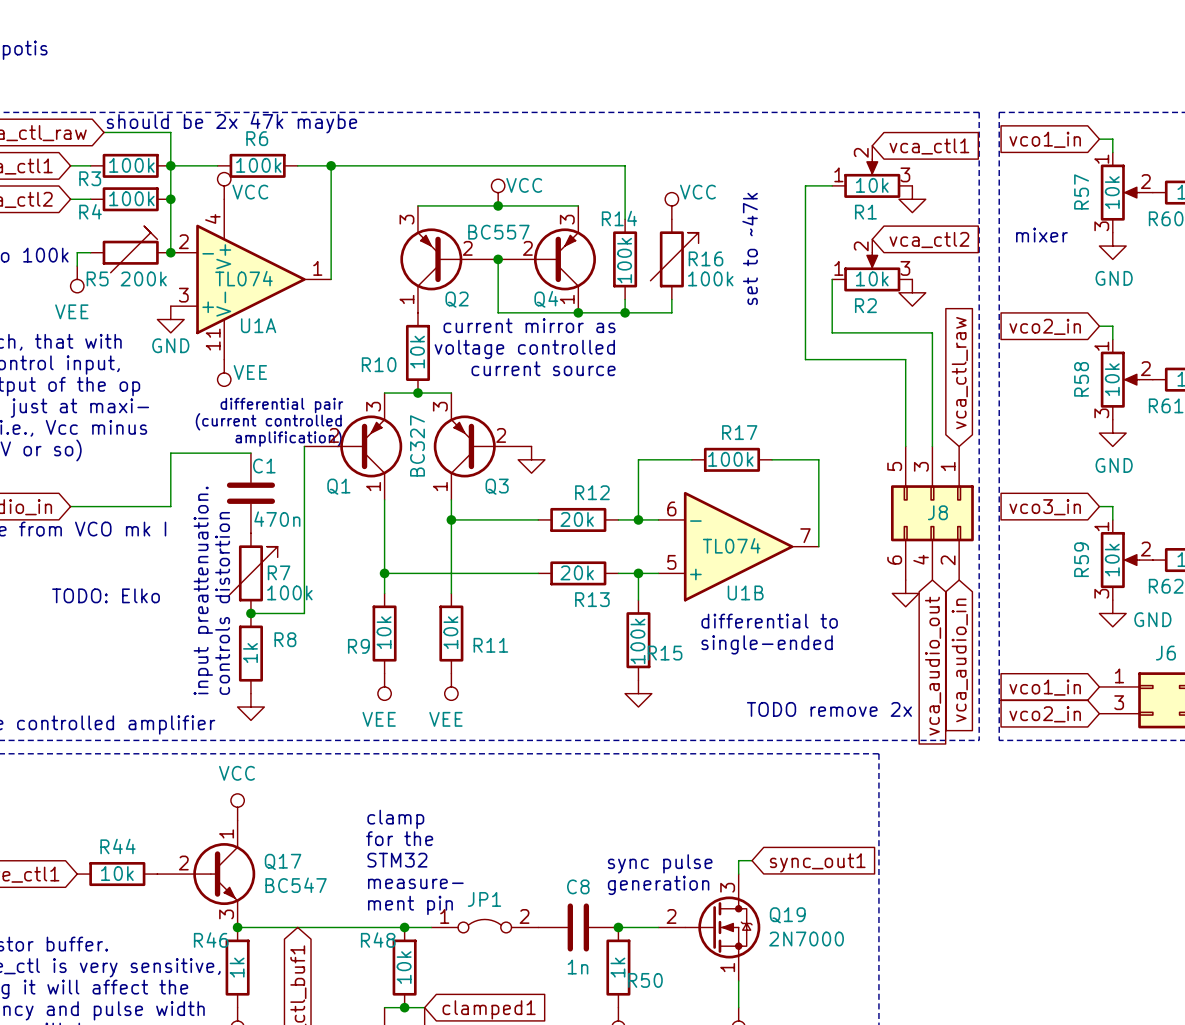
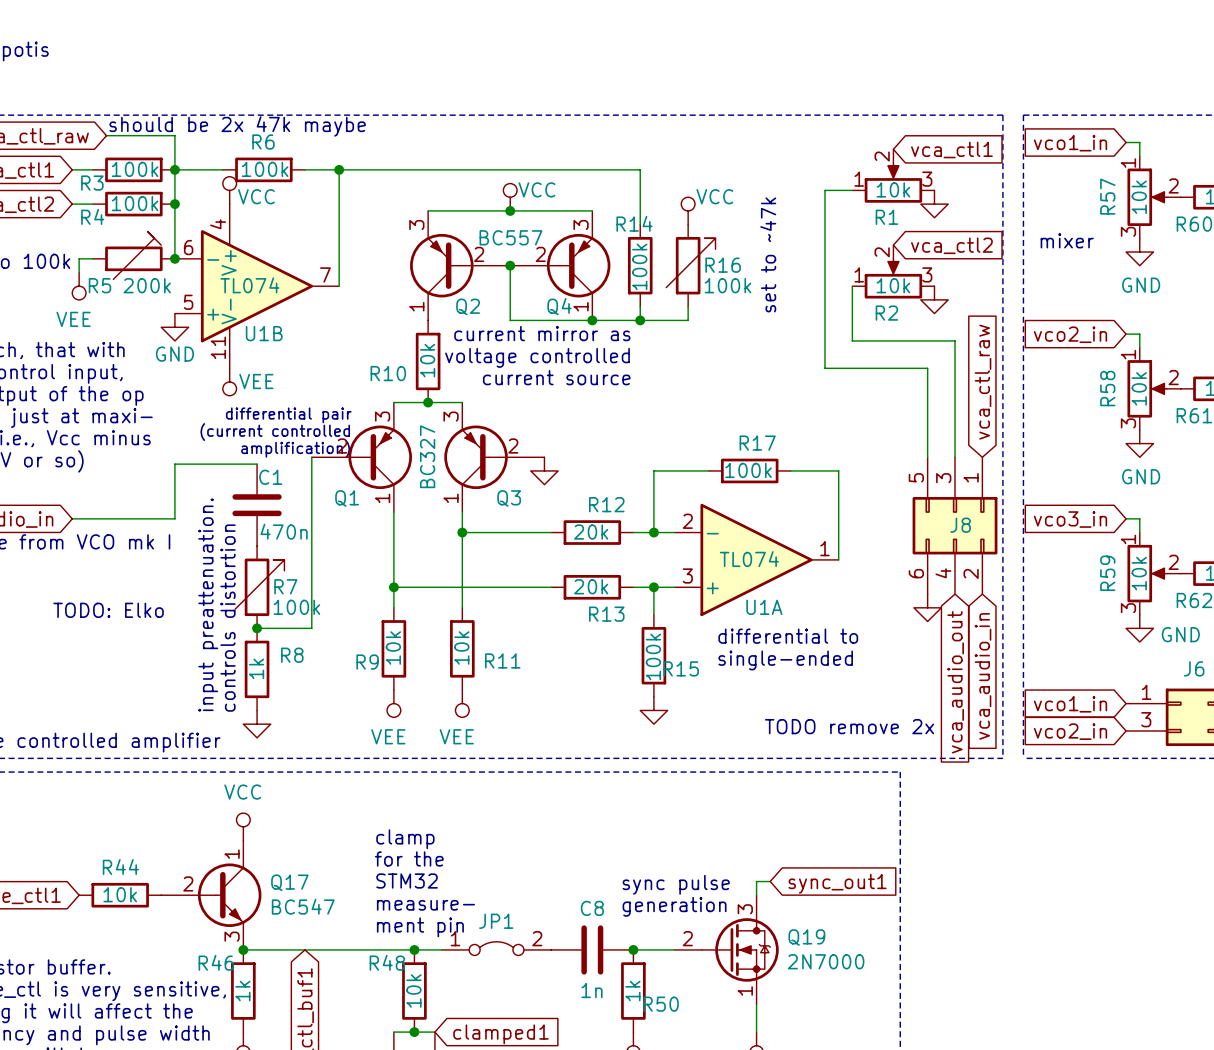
U1A position: (250, 279) -> (756, 559)
U1B position: (738, 546) -> (257, 286)

